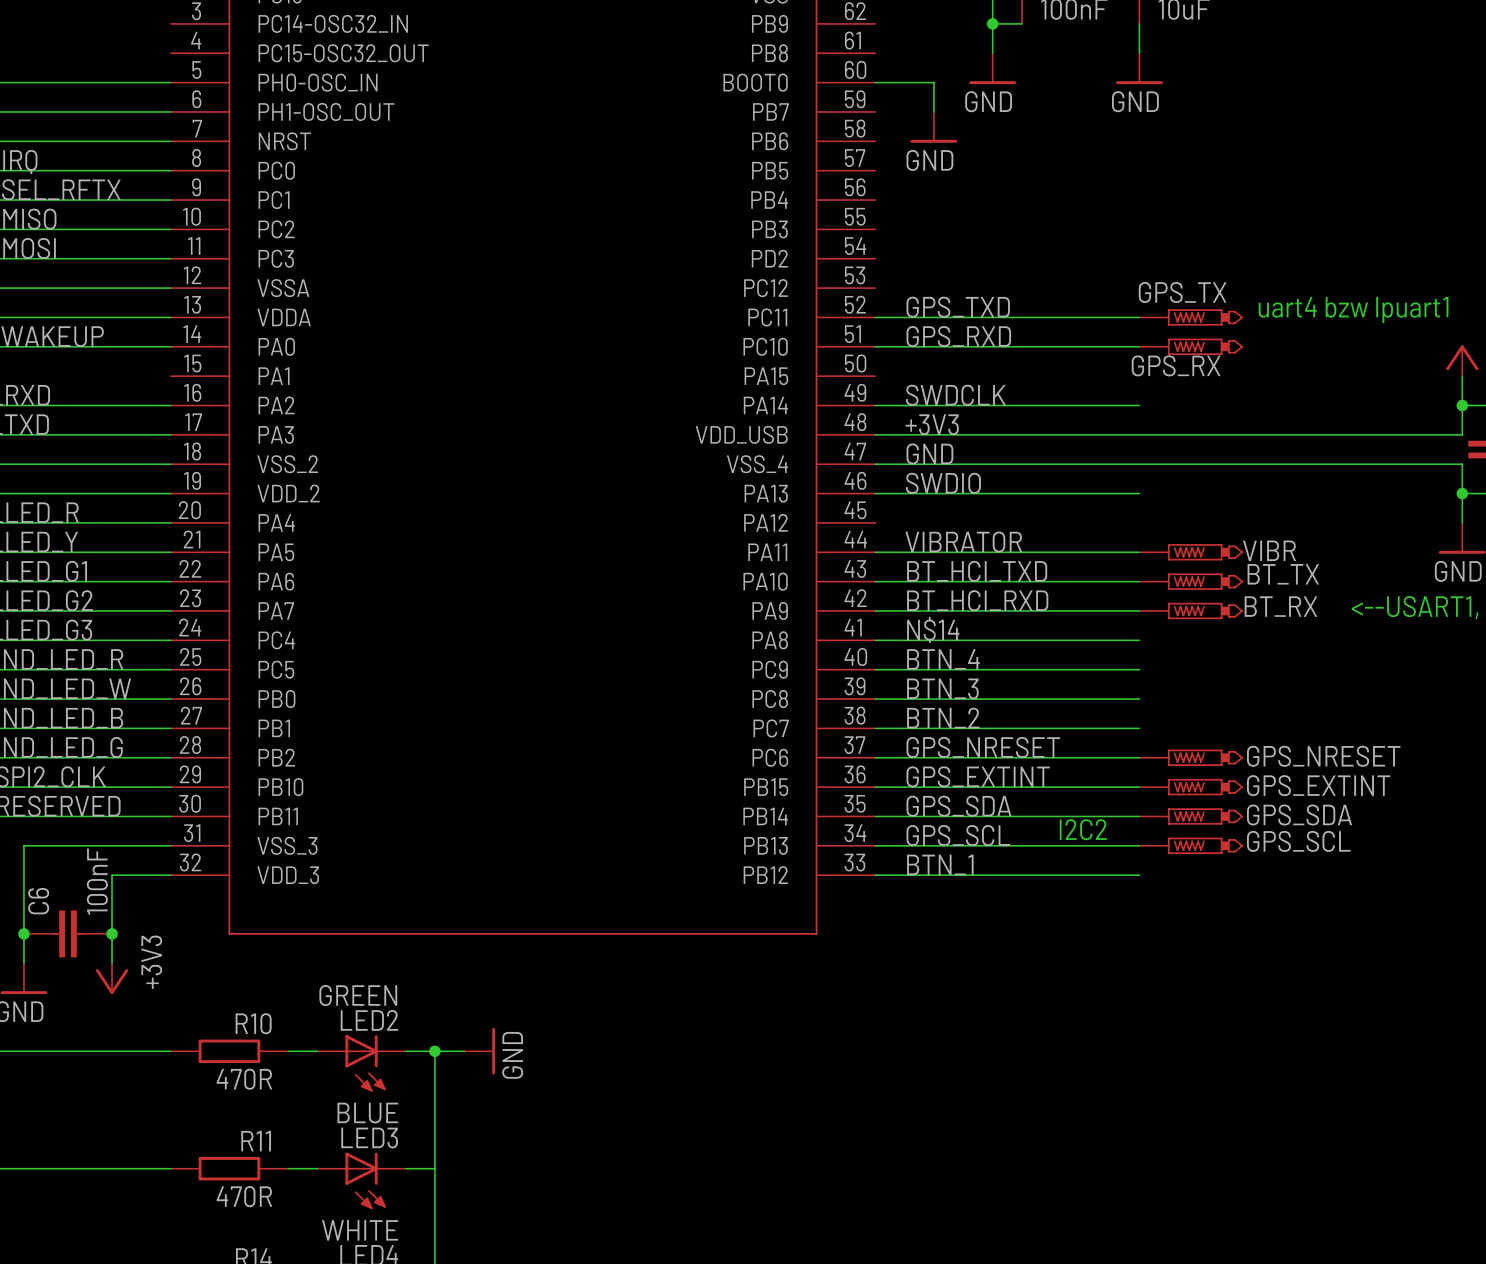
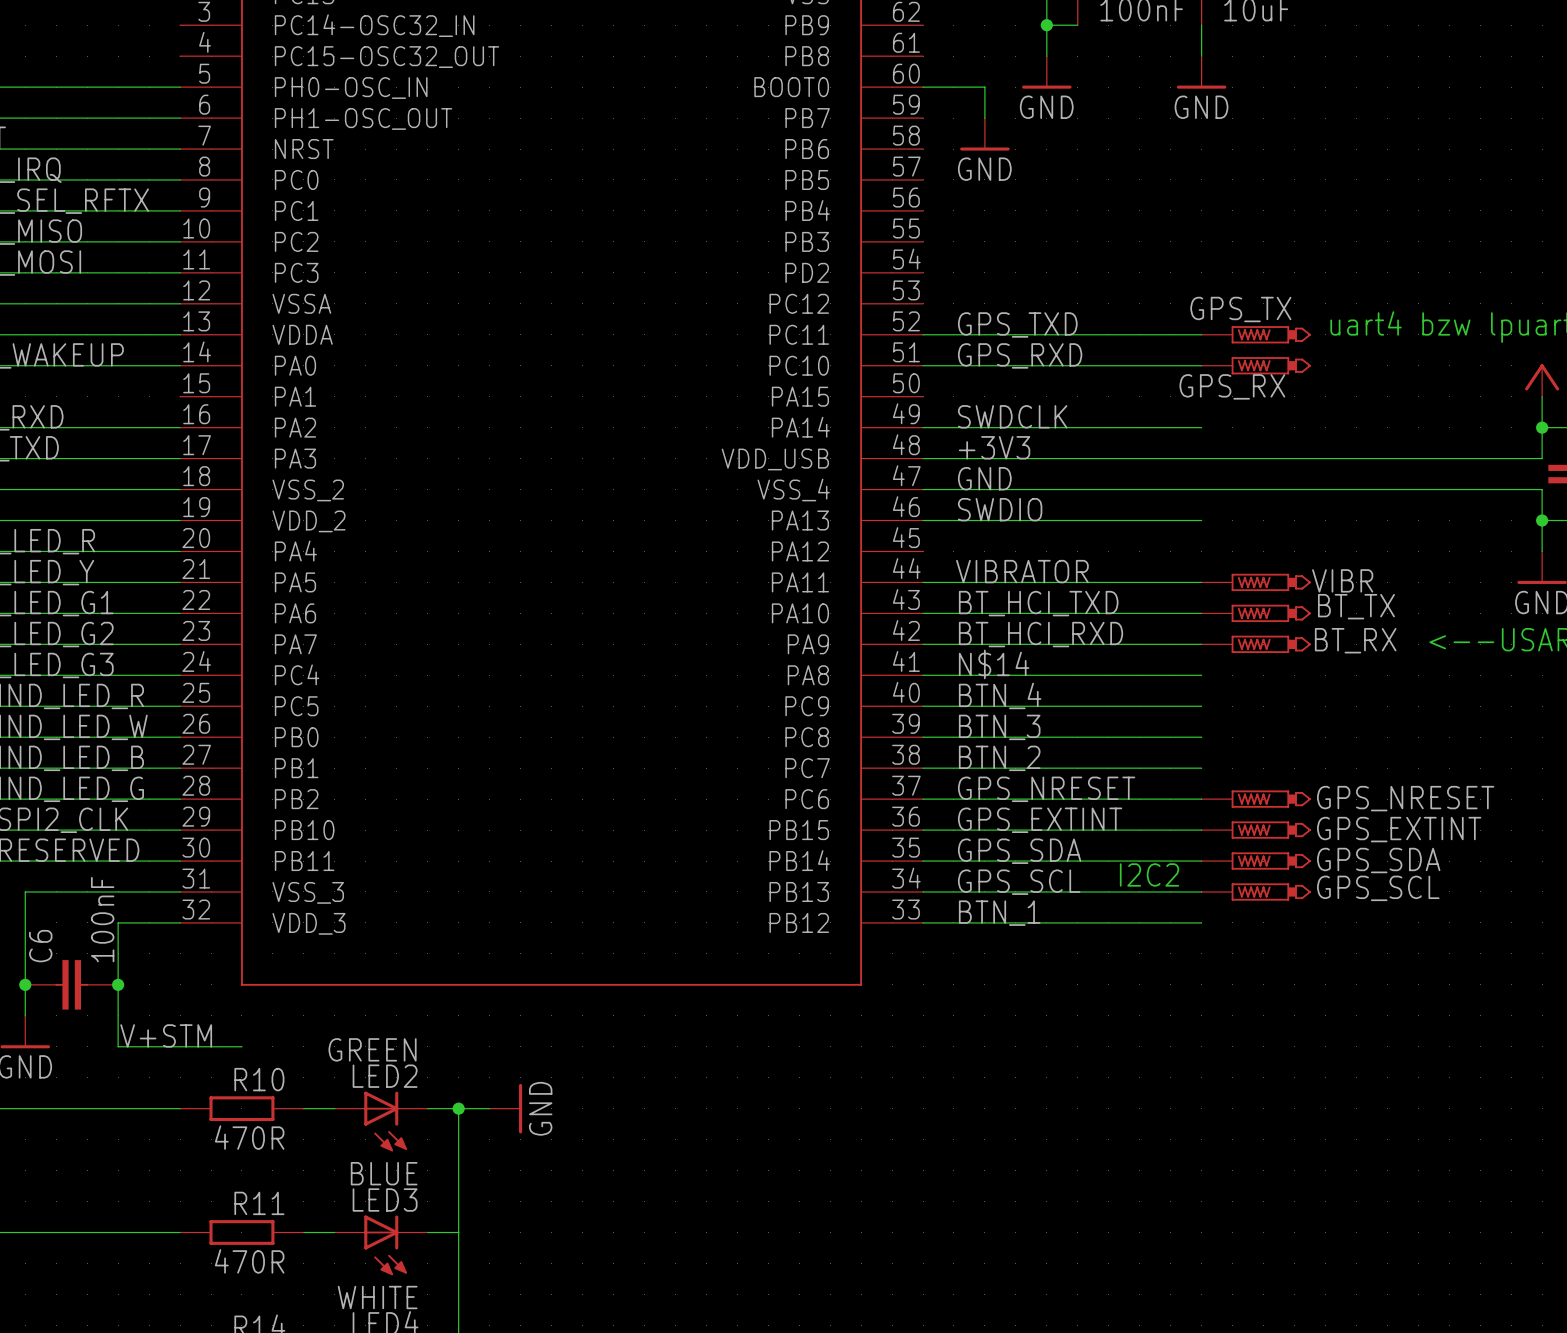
wire: none -> (118, 1015) (118, 1046) (241, 1046)
power symbol: +3V3 (112, 978) -> none
label: none -> V+STM (166, 1035)

